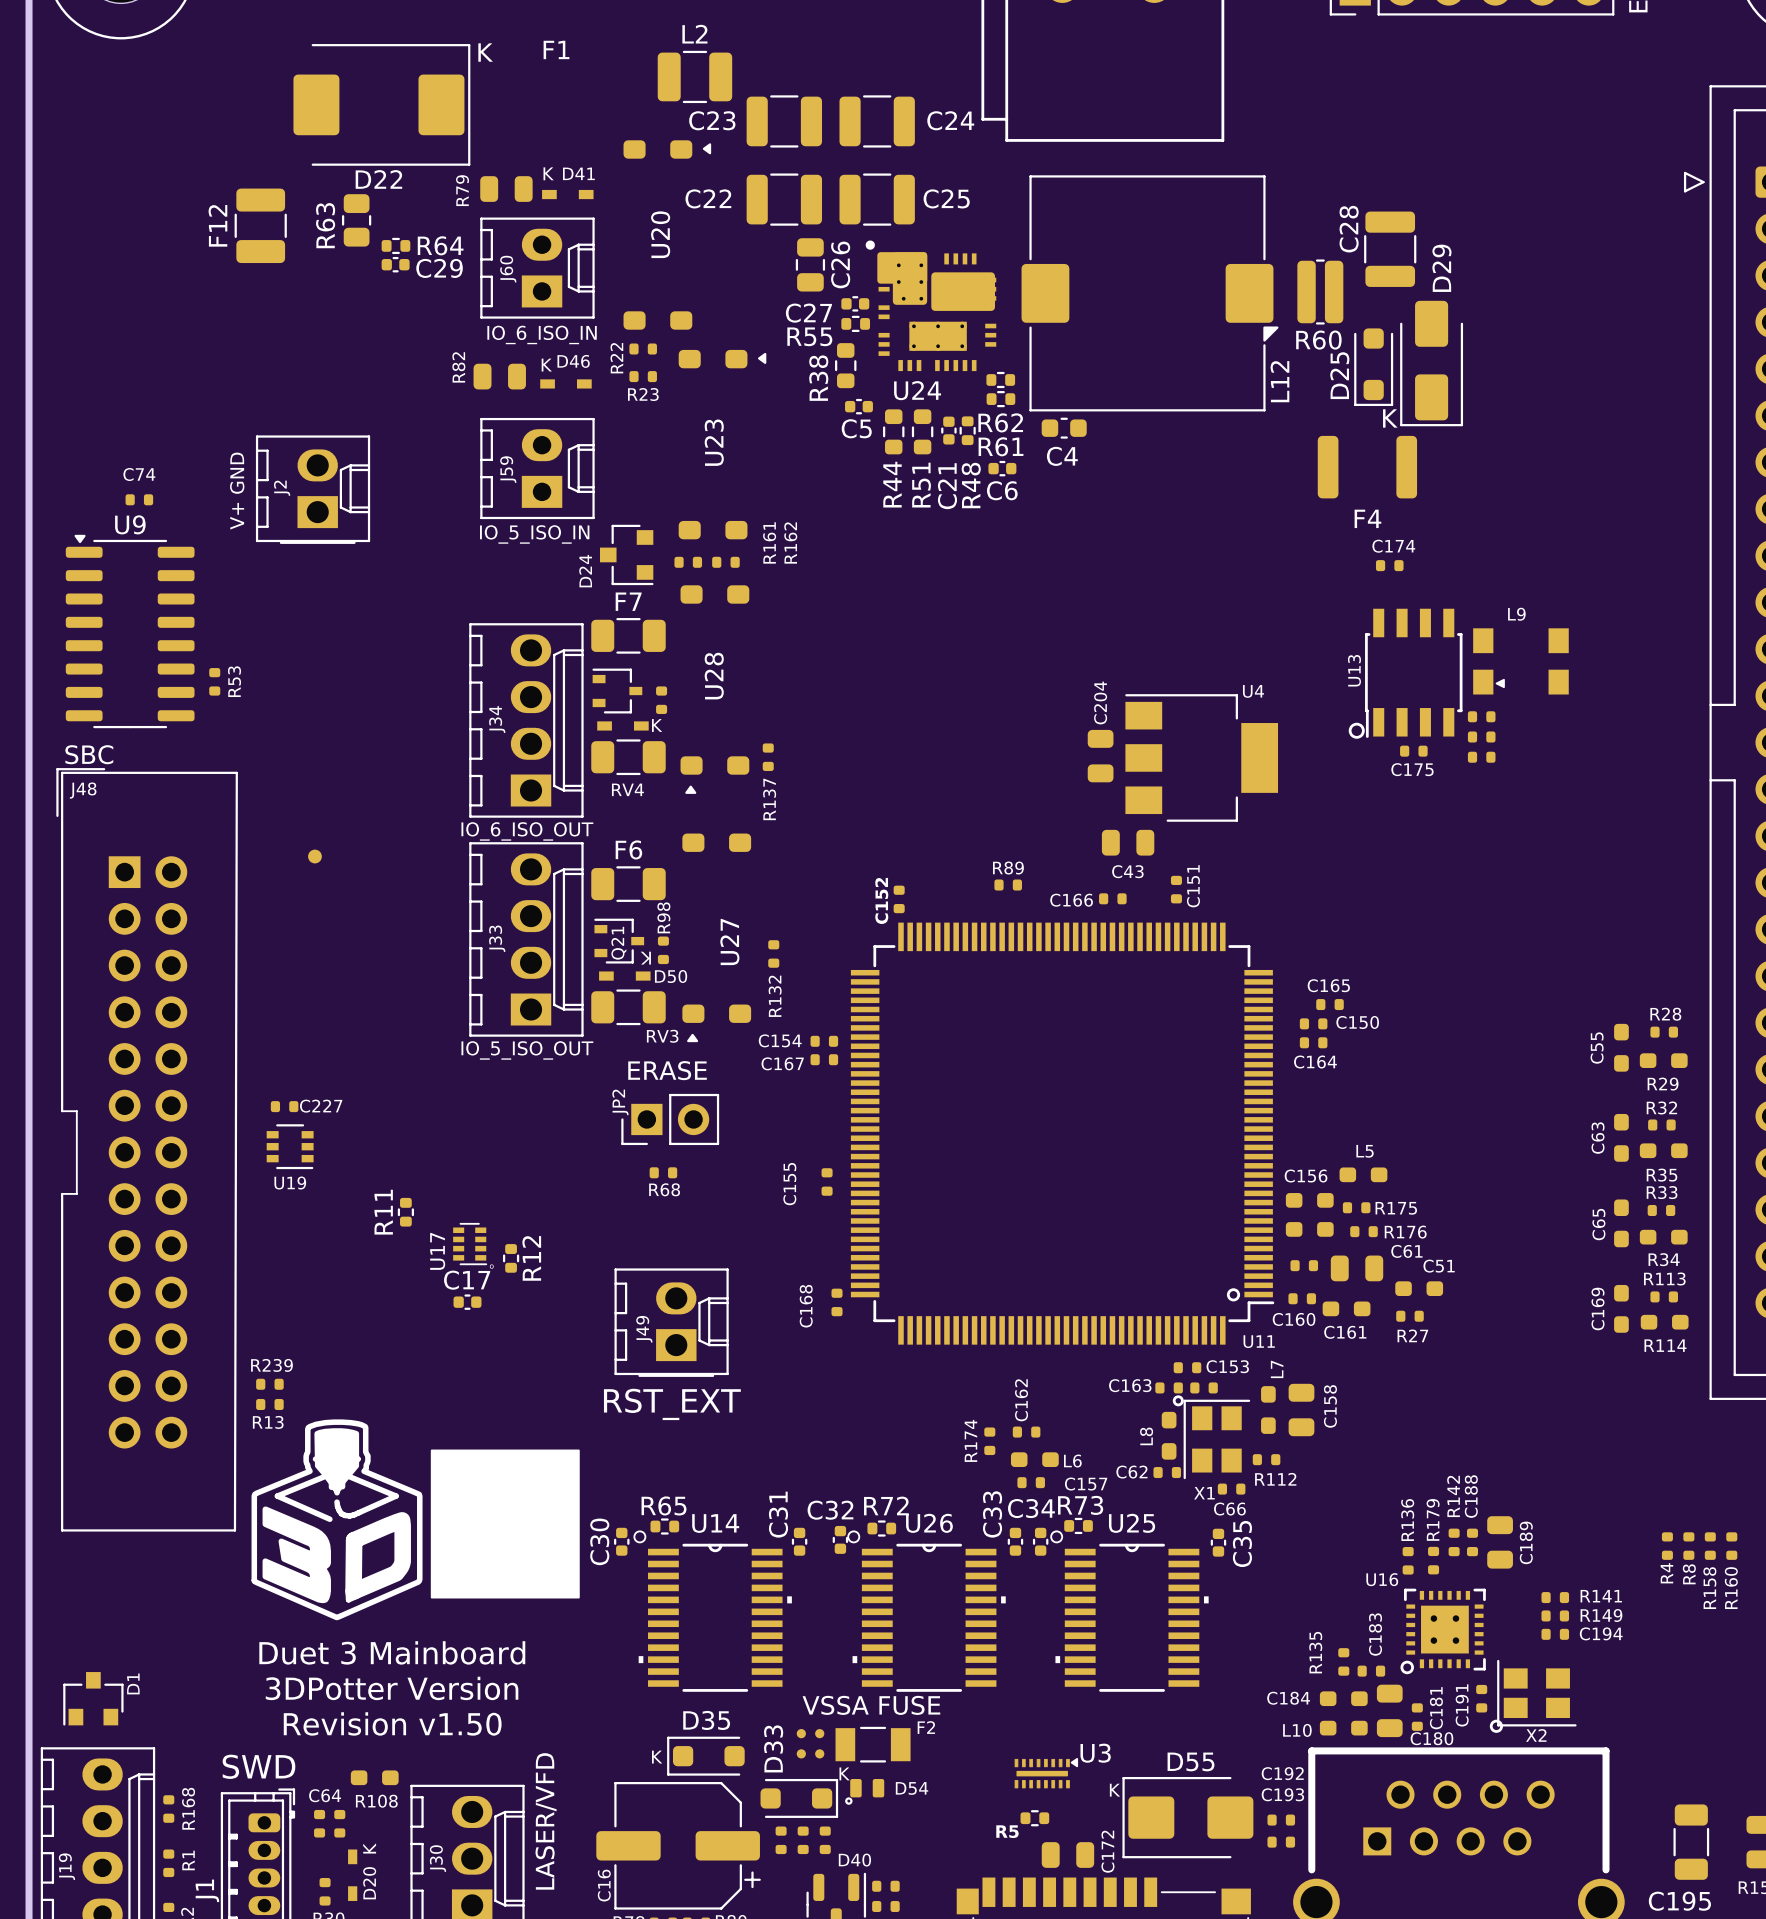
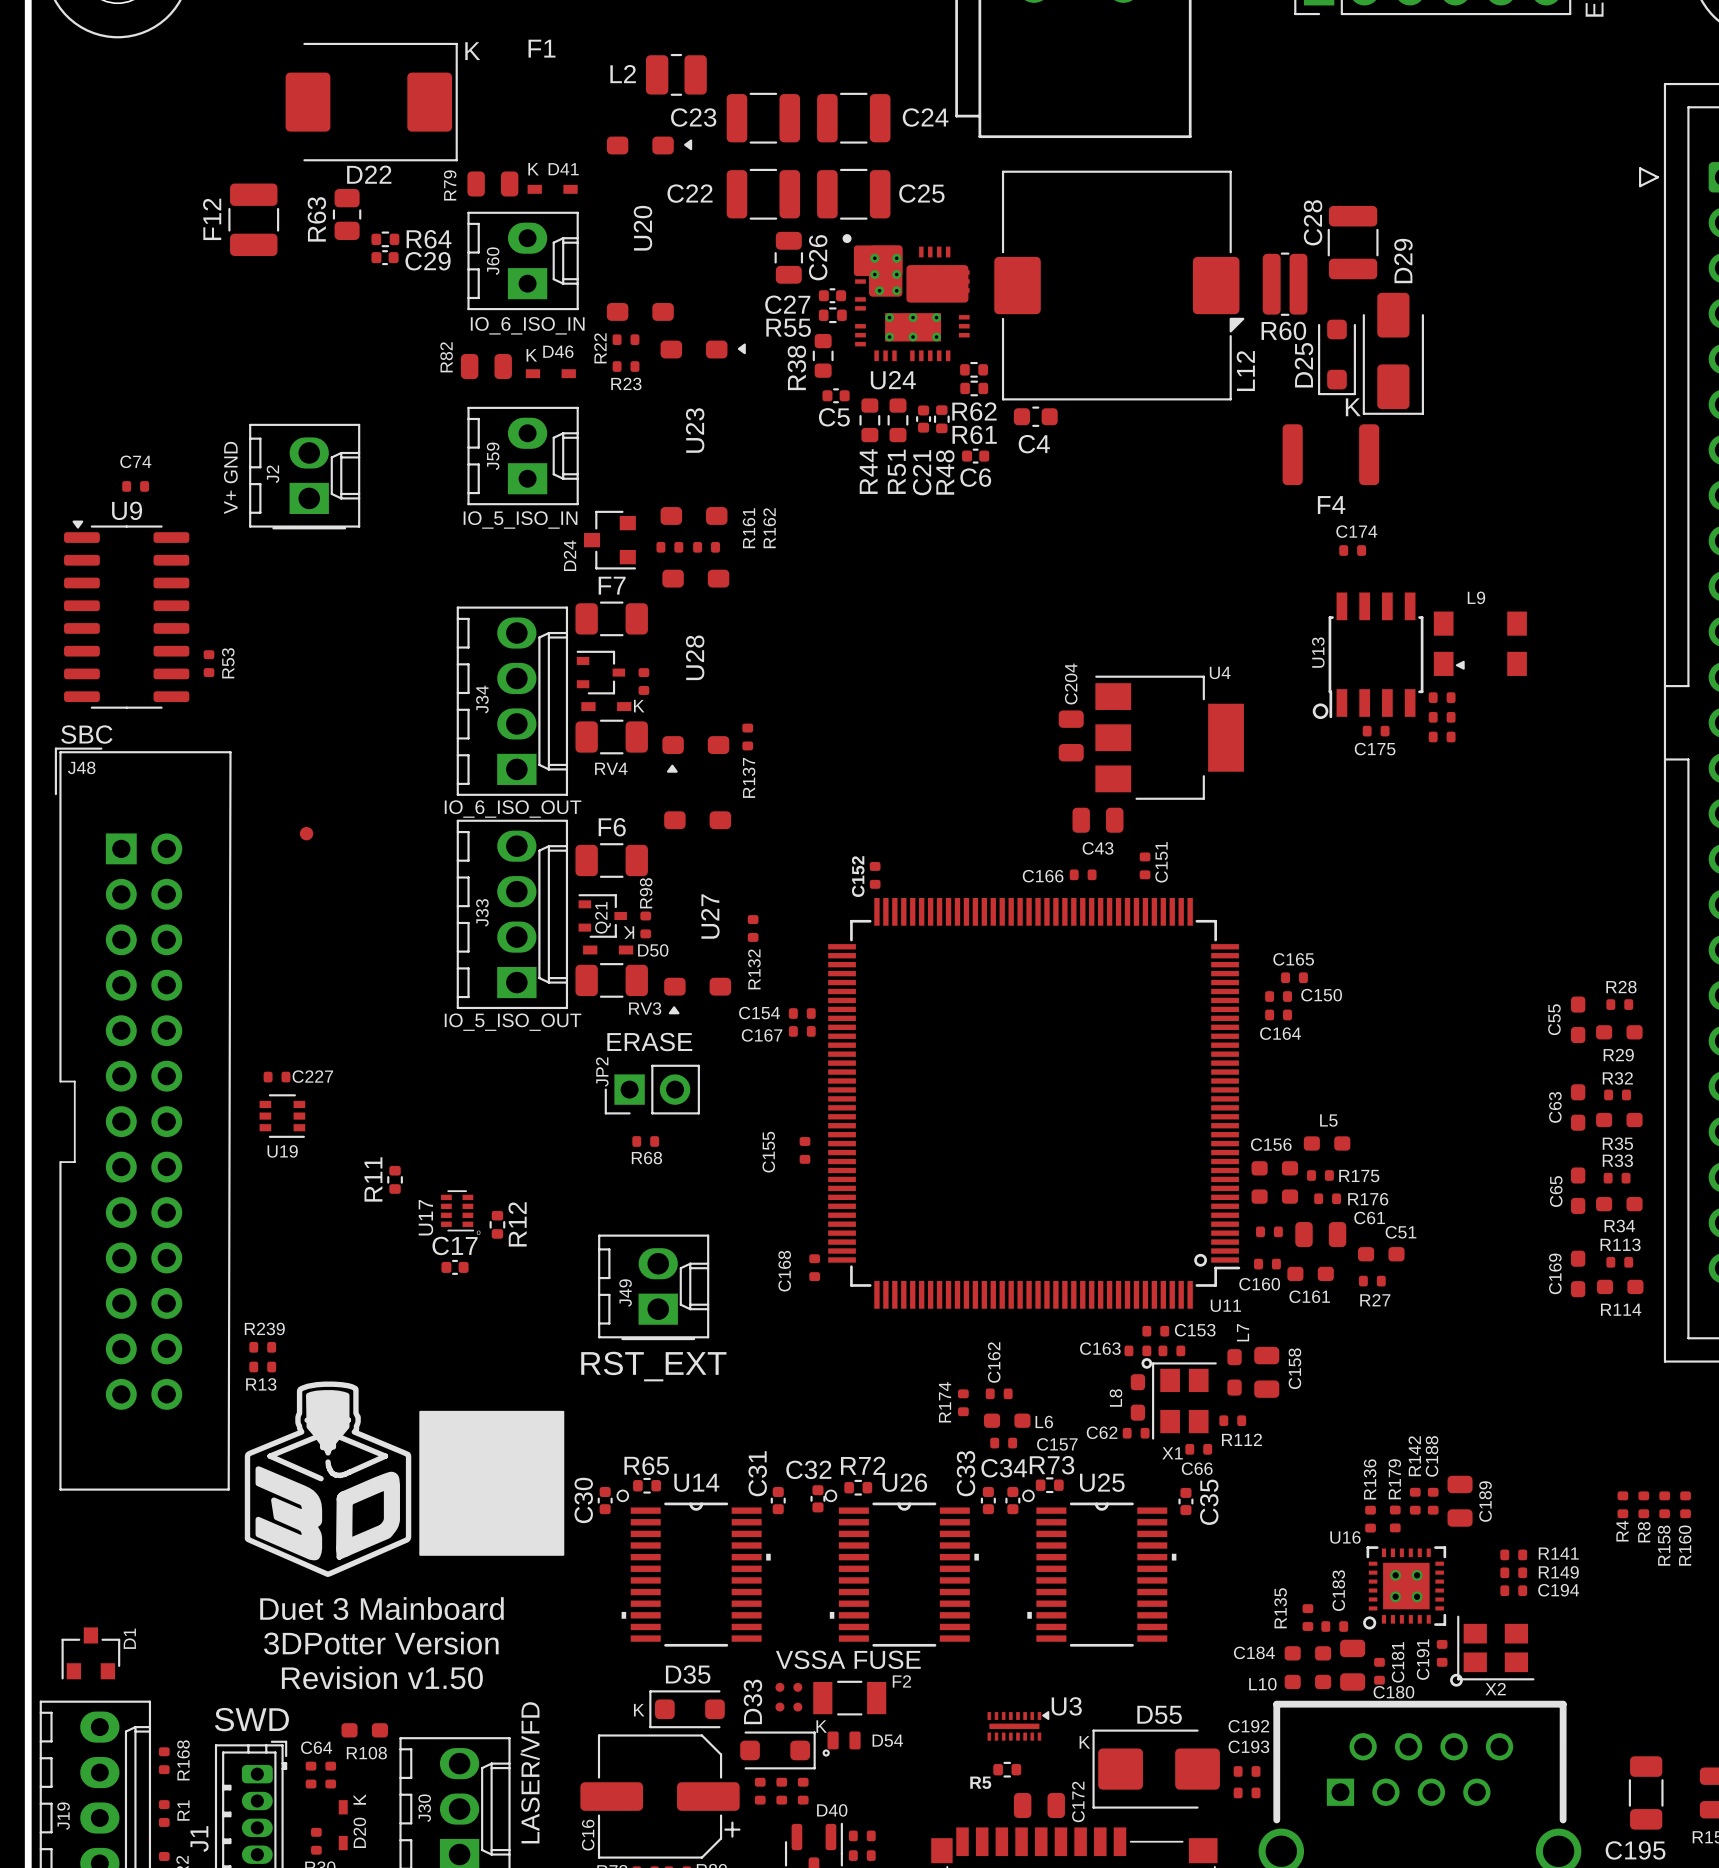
L2 name position: L2 (694, 34) -> L2 (623, 74)
L2 footprint: [657, 50, 733, 104] -> [645, 53, 707, 96]
R89: (1008, 885) -> none

